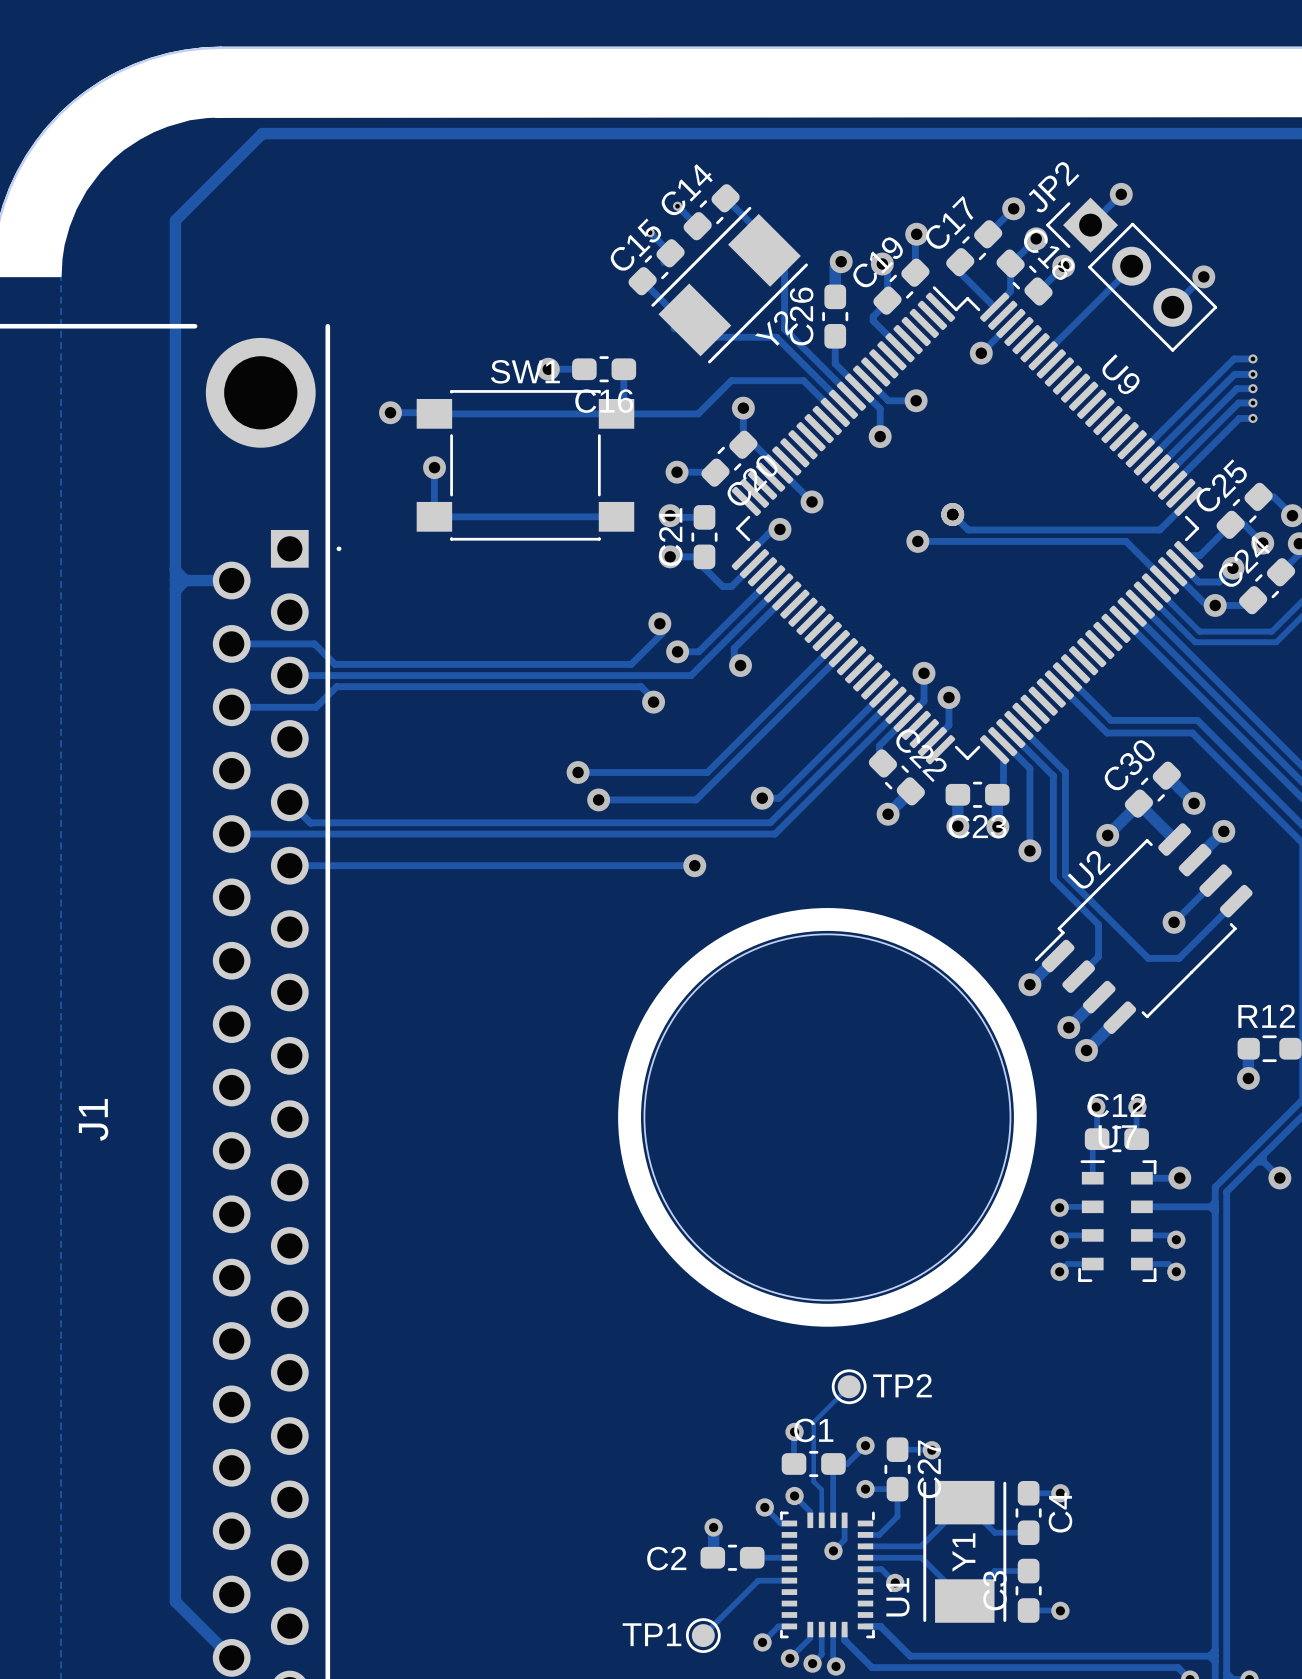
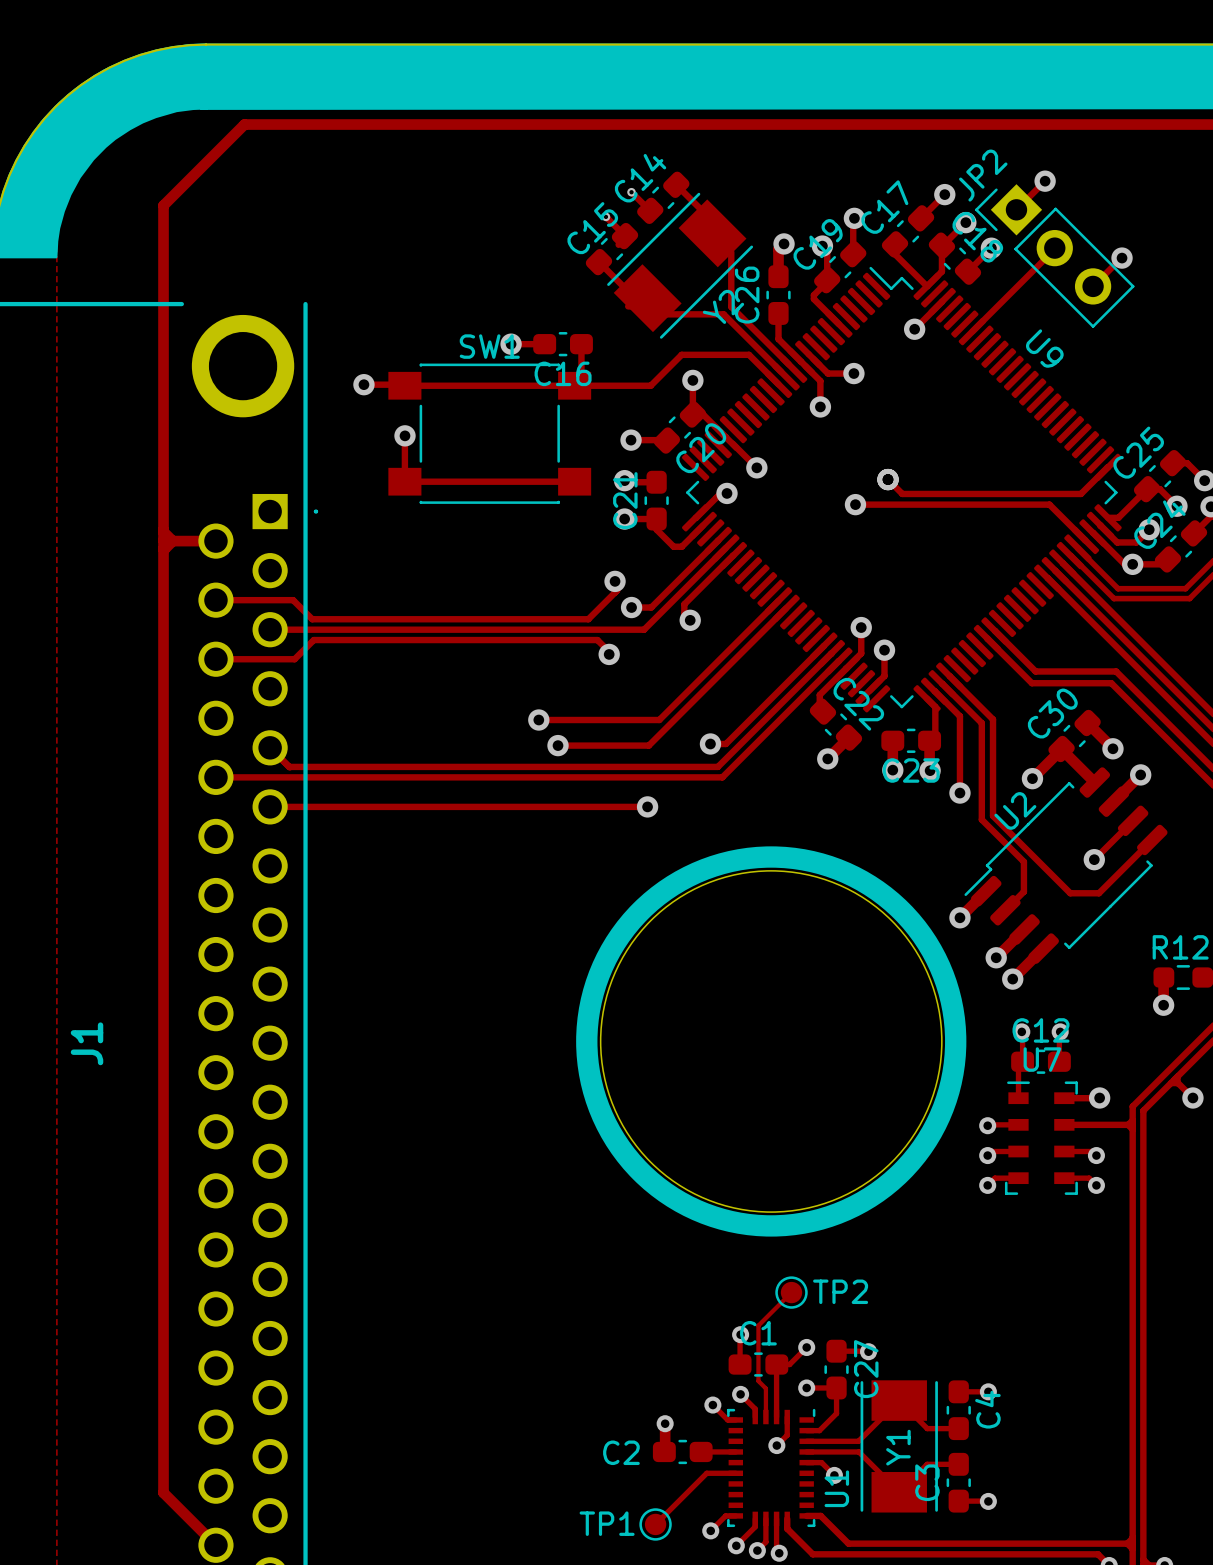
track: (1252, 358) (1234, 358) (1140, 452) -> none
via: (1252, 358) -> none
track: (1252, 374) (1234, 374) (1148, 460) -> none
via: (1252, 374) -> none
track: (1252, 388) (1236, 388) (1156, 469) -> none
via: (1252, 388) -> none
track: (1252, 402) (1238, 402) (1164, 477) -> none
via: (1252, 402) -> none
track: (1252, 418) (1239, 418) (1172, 485) -> none
via: (1252, 418) -> none

